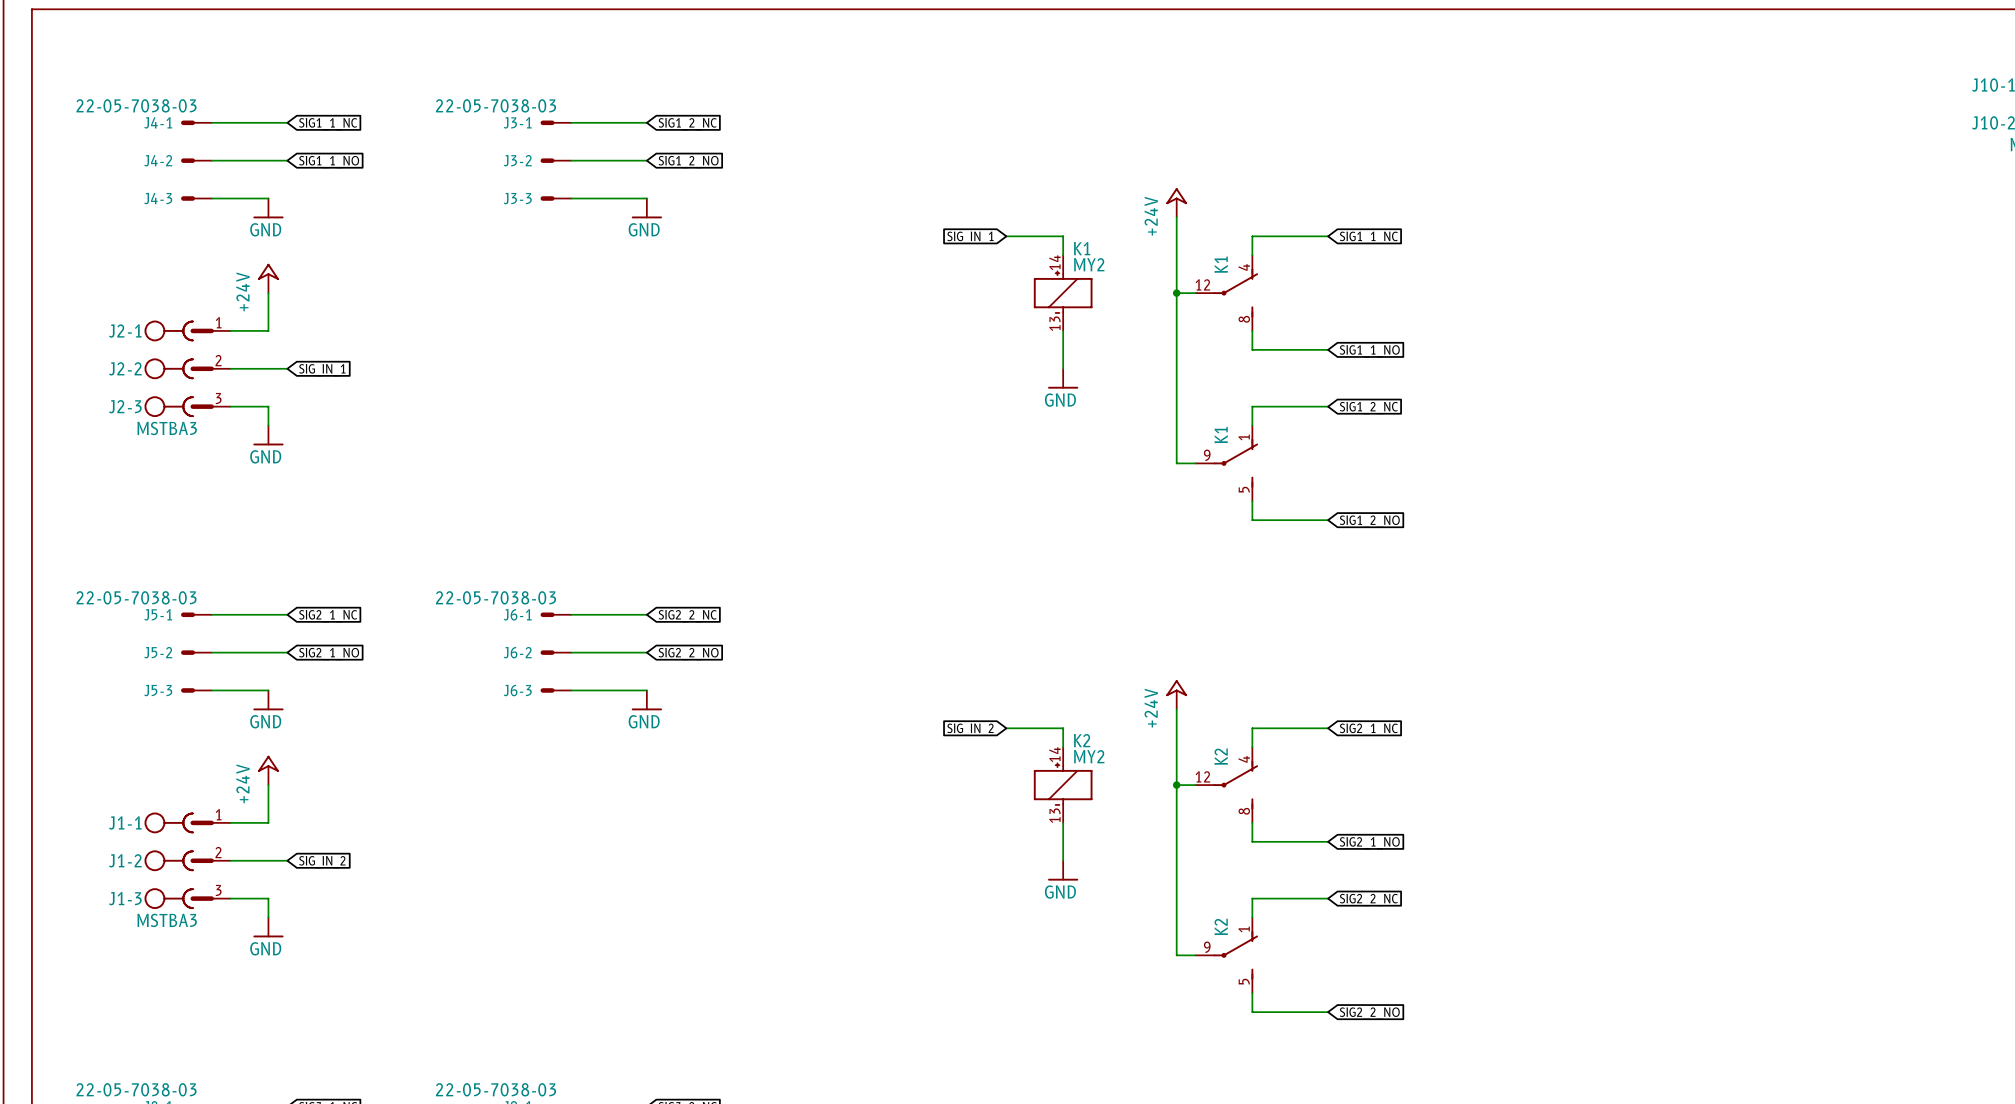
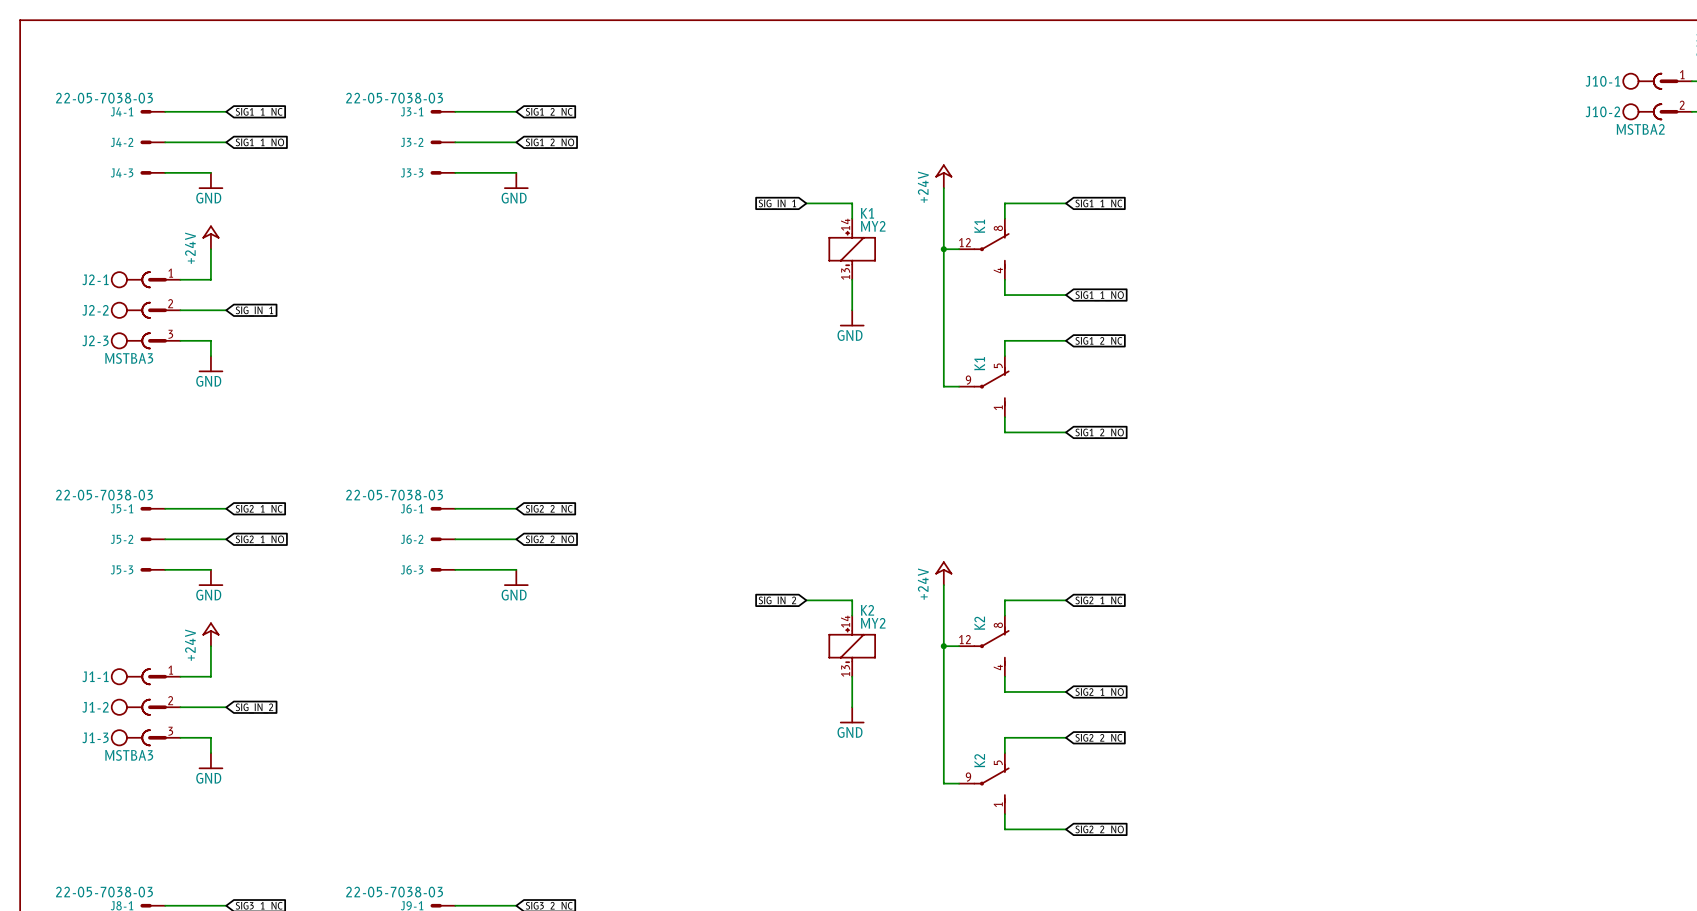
K1 pin number: 4 (1244, 267) -> 8 (998, 228)
K1 pin number: 8 (1244, 319) -> 4 (998, 270)
K1 pin number: 1 (1244, 437) -> 5 (998, 365)
K1 pin number: 5 (1244, 489) -> 1 (998, 407)
K2 pin number: 4 (1244, 759) -> 8 (998, 625)
K2 pin number: 8 (1244, 811) -> 4 (998, 667)
K2 pin number: 1 (1244, 929) -> 5 (998, 762)
K2 pin number: 5 (1244, 981) -> 1 (998, 804)

